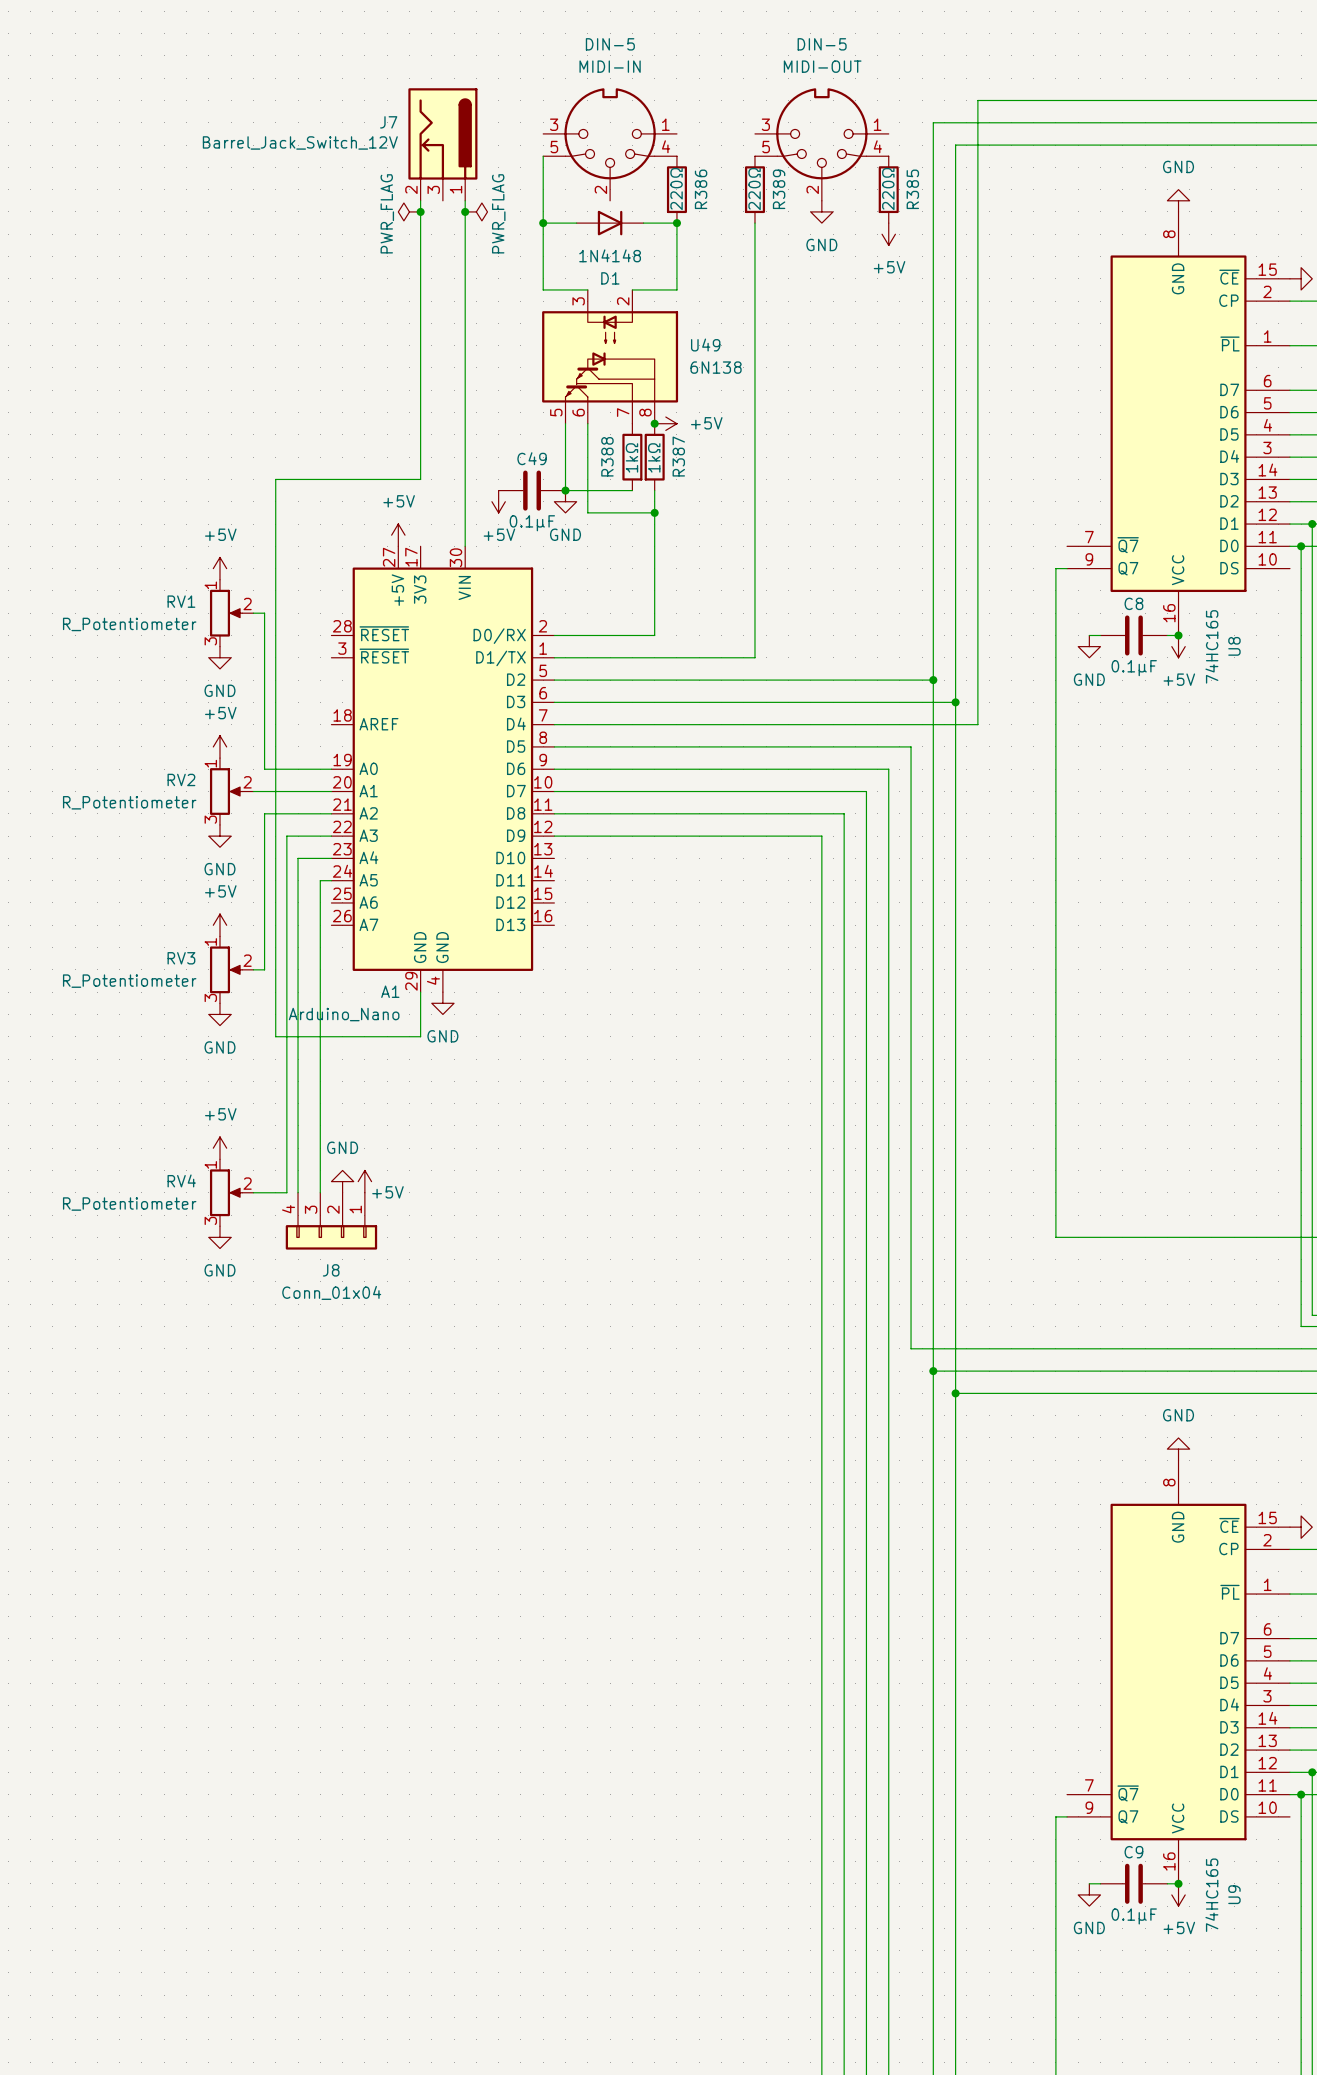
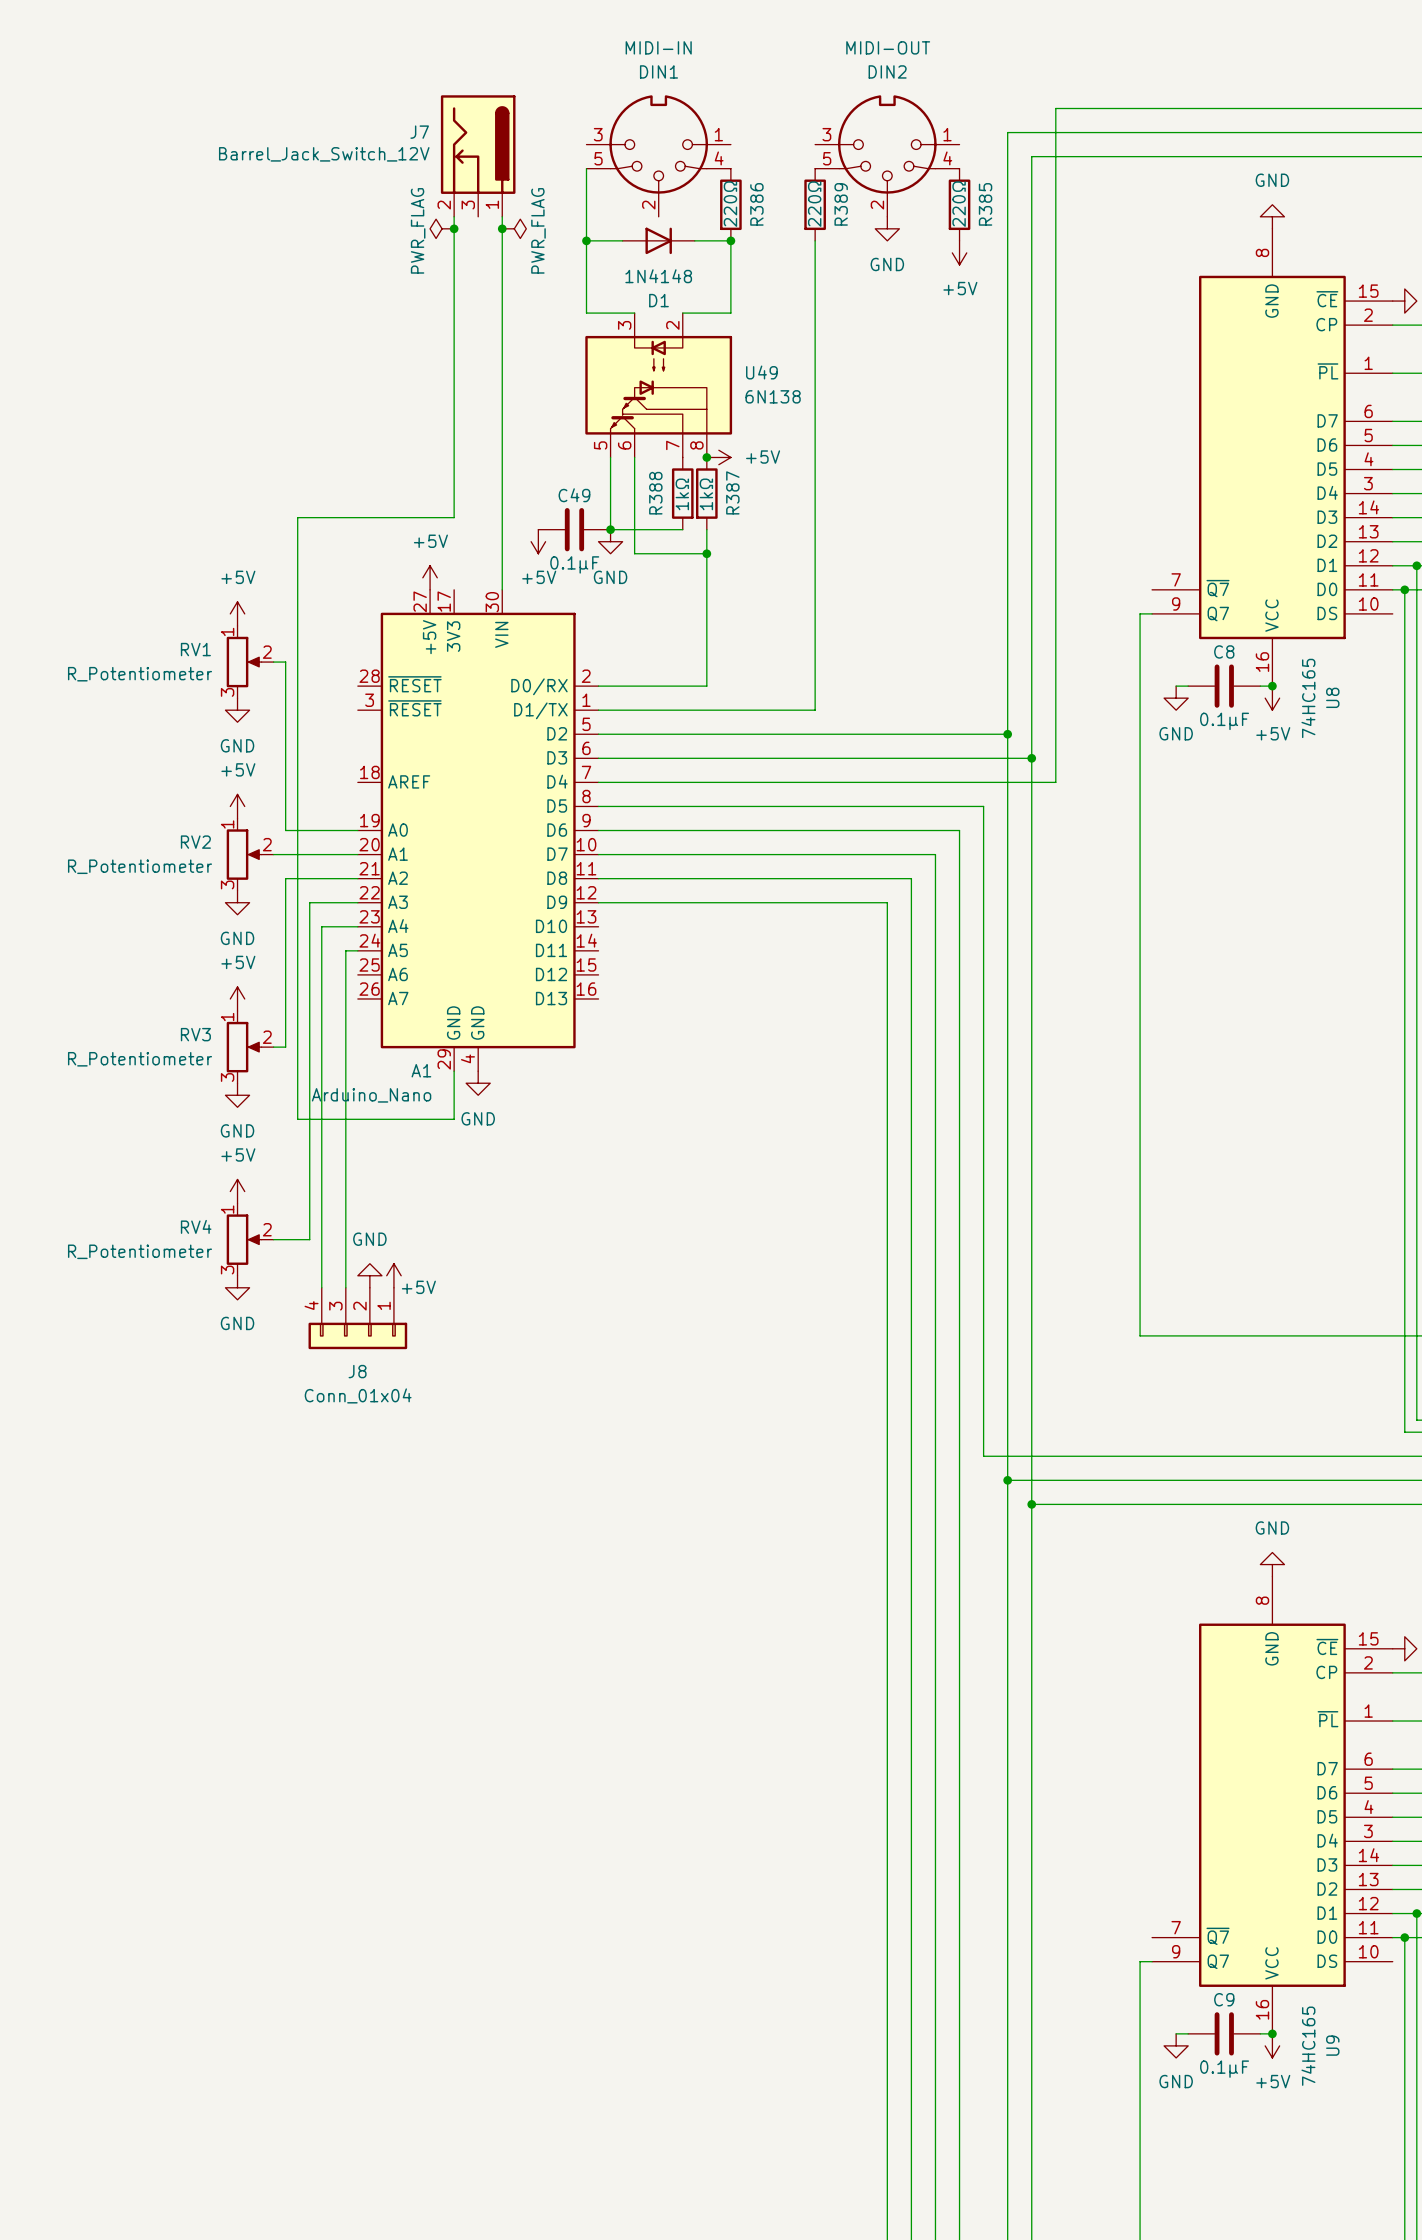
MIDI-IN value: DIN-5 (610, 44) -> MIDI-IN (658, 47)
MIDI-OUT value: DIN-5 (822, 44) -> MIDI-OUT (888, 47)
MIDI-IN name: MIDI-IN (610, 66) -> DIN1 (658, 71)
MIDI-OUT name: MIDI-OUT (822, 66) -> DIN2 (887, 71)
power symbol position: +5V (219, 1148) -> +5V (237, 1191)
wire: (286, 1148) (286, 1192) (253, 1192) -> (309, 1239) (273, 1239)
RV4 position: (231, 1192) -> (250, 1239)
power symbol position: GND (219, 1237) -> GND (237, 1287)

